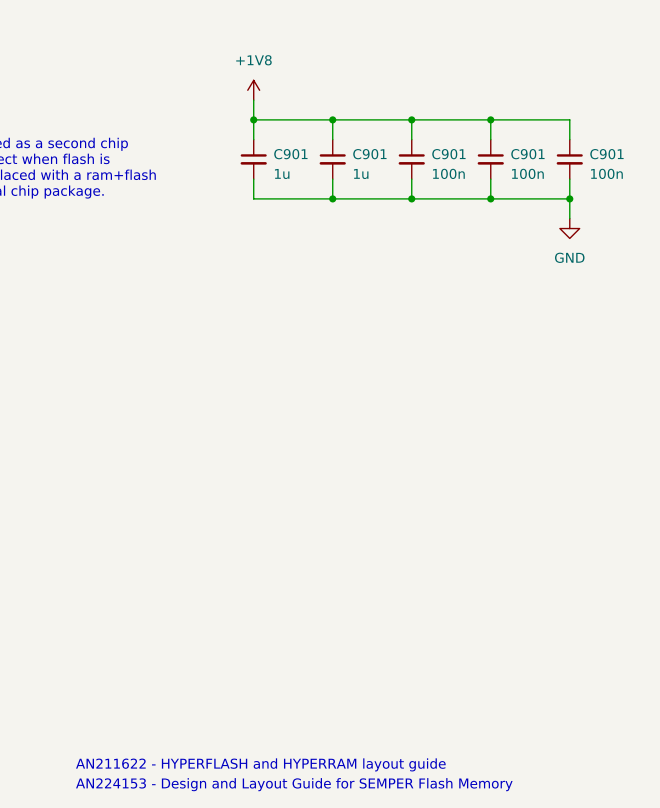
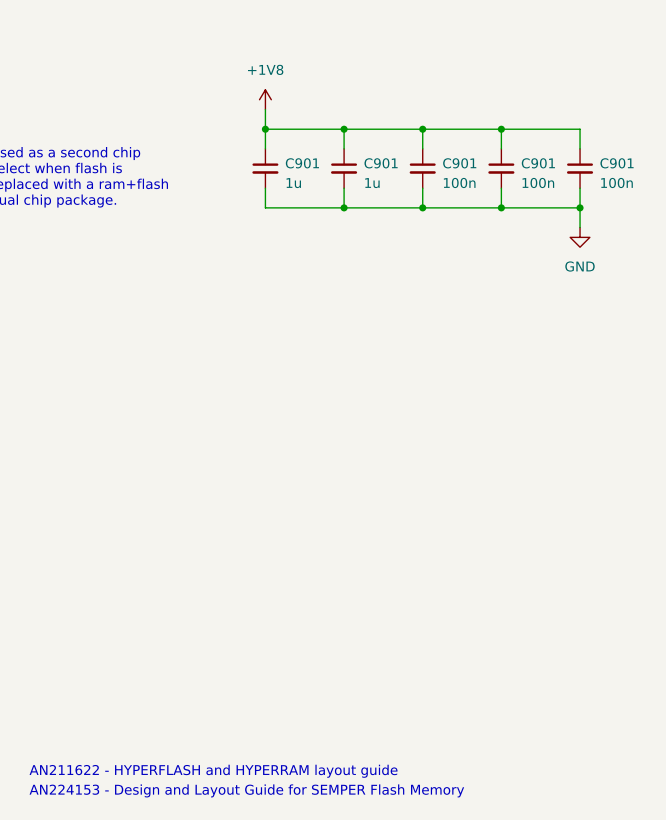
text position: AN211622 - HYPERFLASH and HYPERRAM layout guide (260, 764) -> AN211622 - HYPERFLASH and HYPERRAM layout guide (213, 771)
text position: AN224153 - Design and Layout Guide for SEMPER Flash Memory (294, 784) -> AN224153 - Design and Layout Guide for SEMPER Flash Memory (246, 790)

